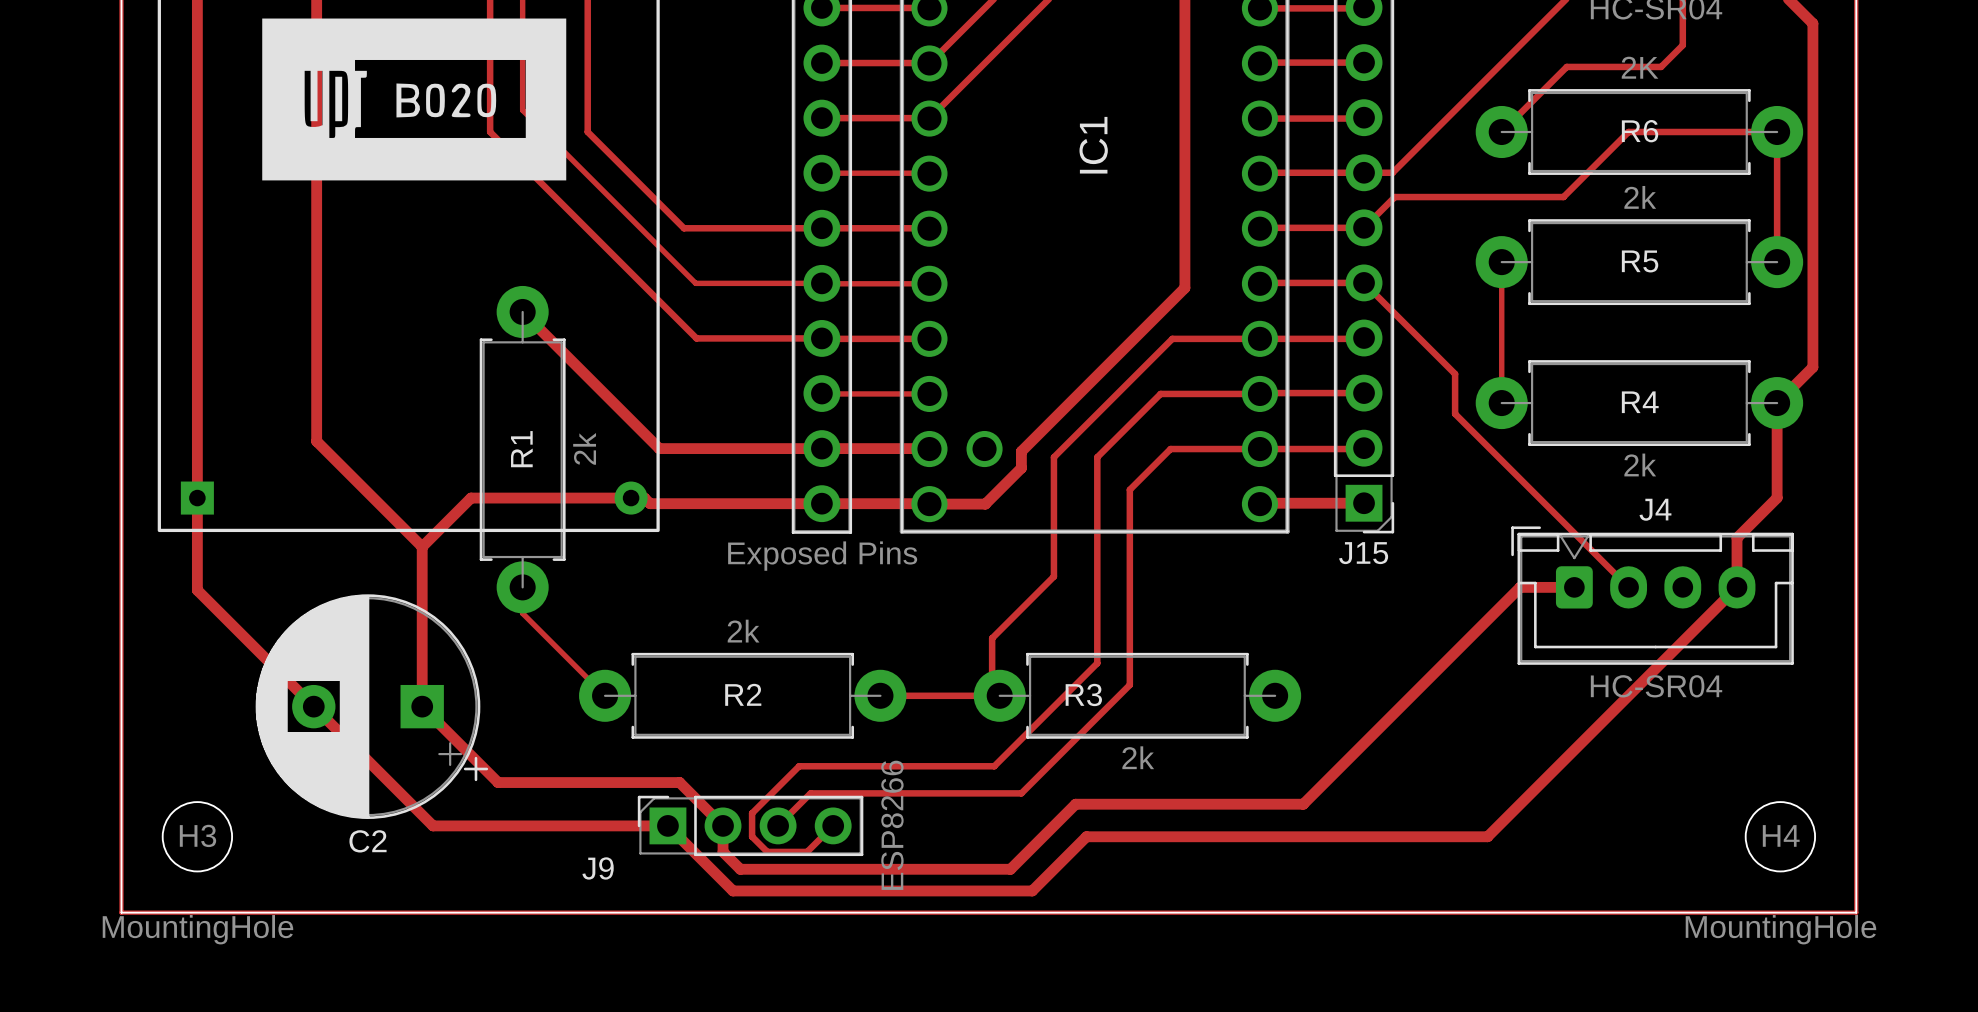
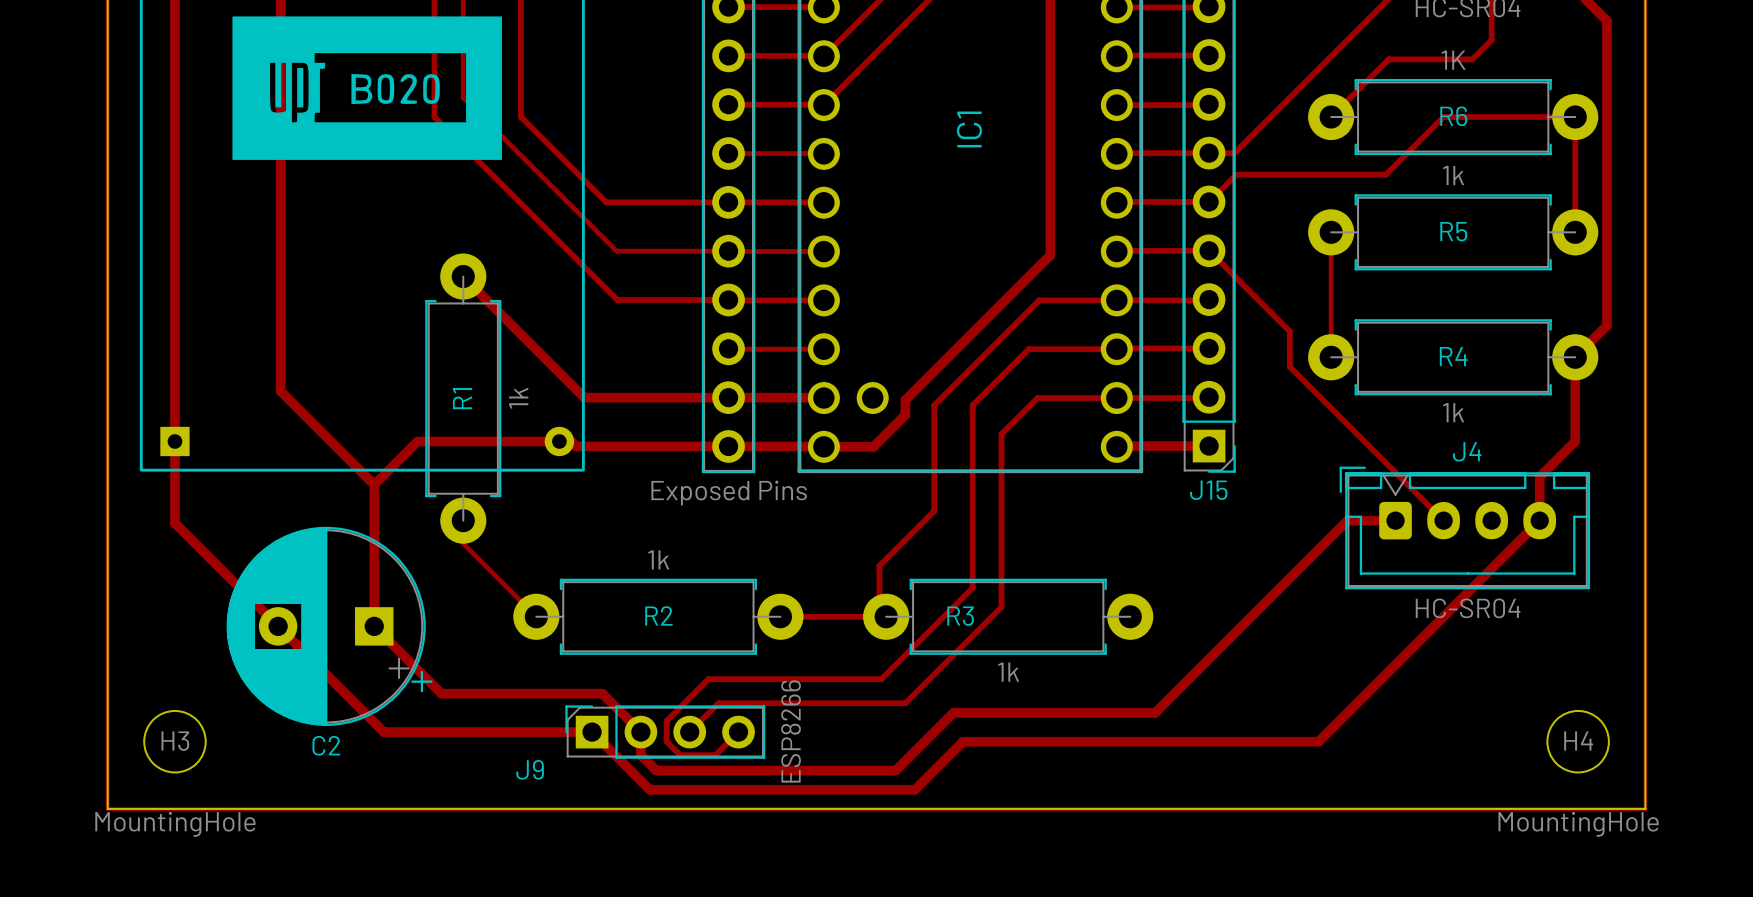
R6 value: 2K (1640, 67) -> 1K (1453, 60)
R5 value: 2k (1640, 197) -> 1k (1453, 175)
R1 value: 2k (584, 448) -> 1k (518, 398)
R4 value: 2k (1640, 464) -> 1k (1453, 412)
R2 value: 2k (743, 631) -> 1k (658, 559)
R3 value: 2k (1138, 757) -> 1k (1008, 672)

